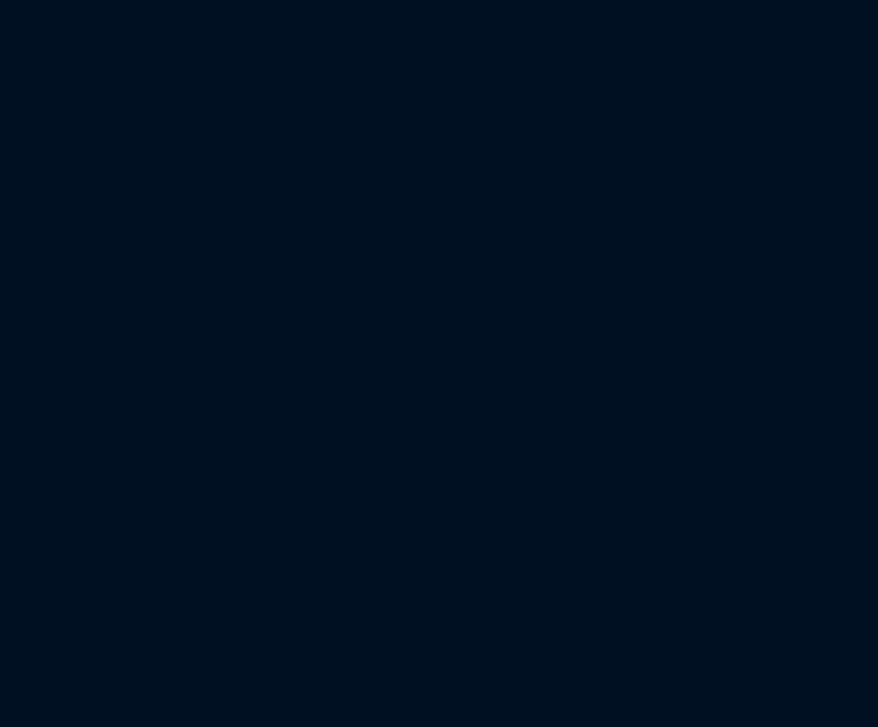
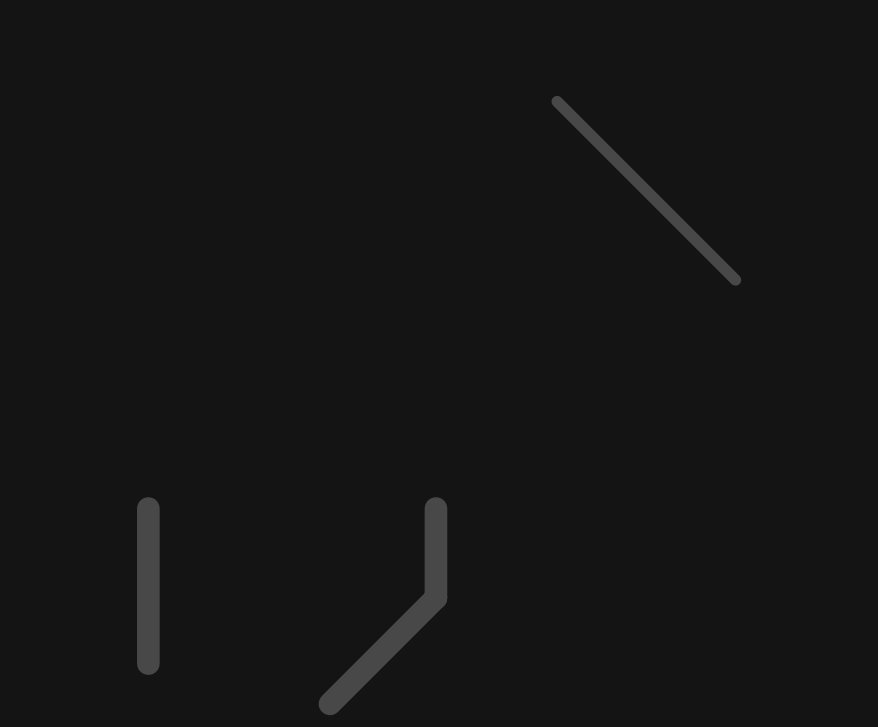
track: none -> (557, 101) (735, 280)
track: none -> (148, 508) (148, 663)
track: none -> (435, 508) (435, 597) (329, 703)

